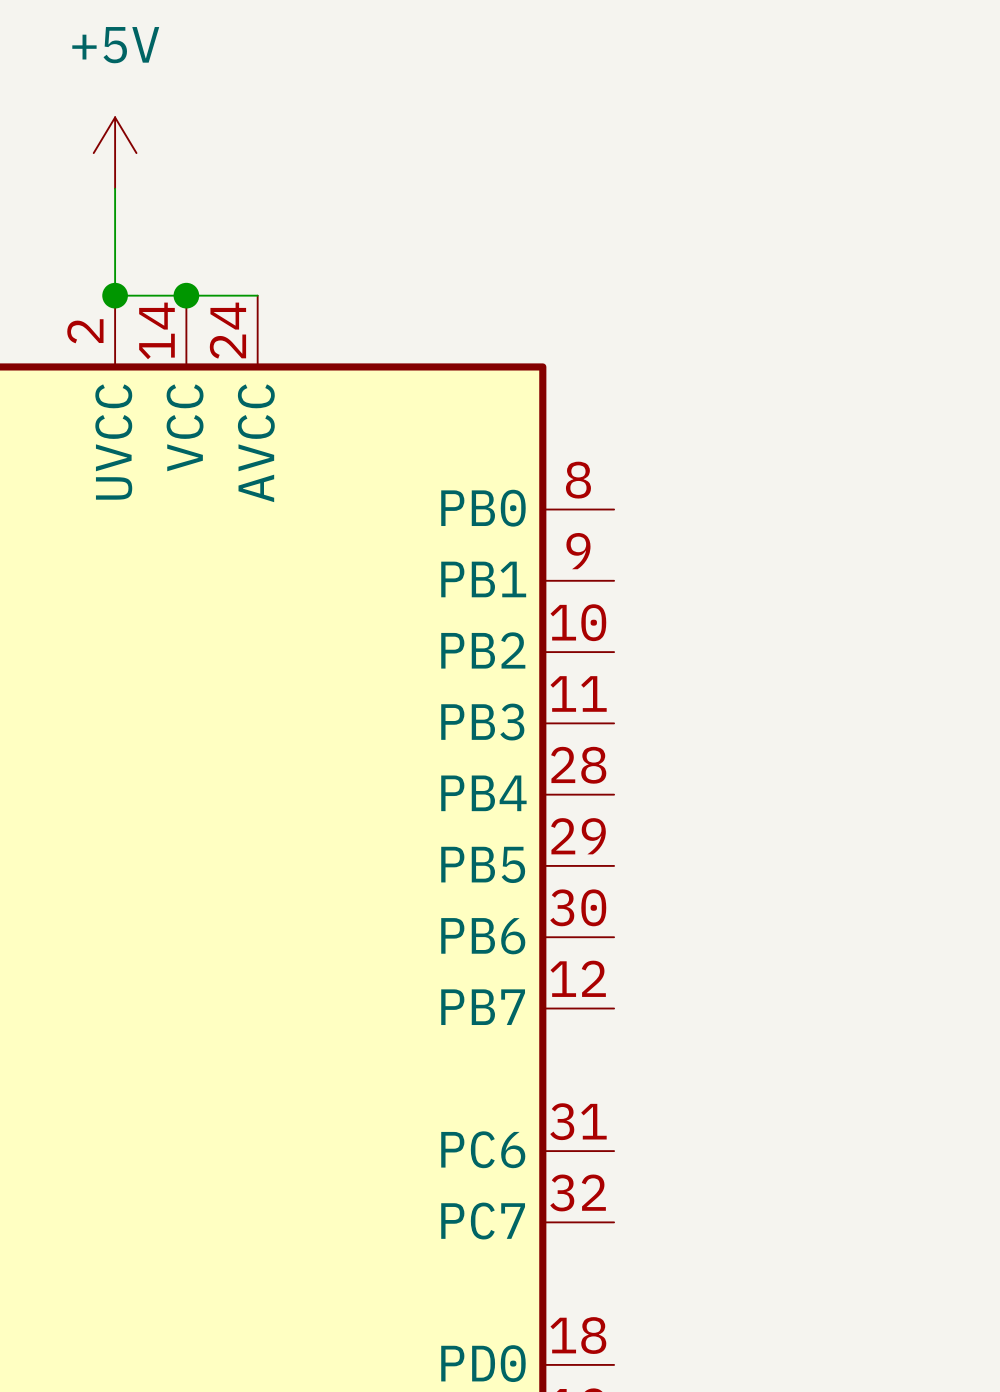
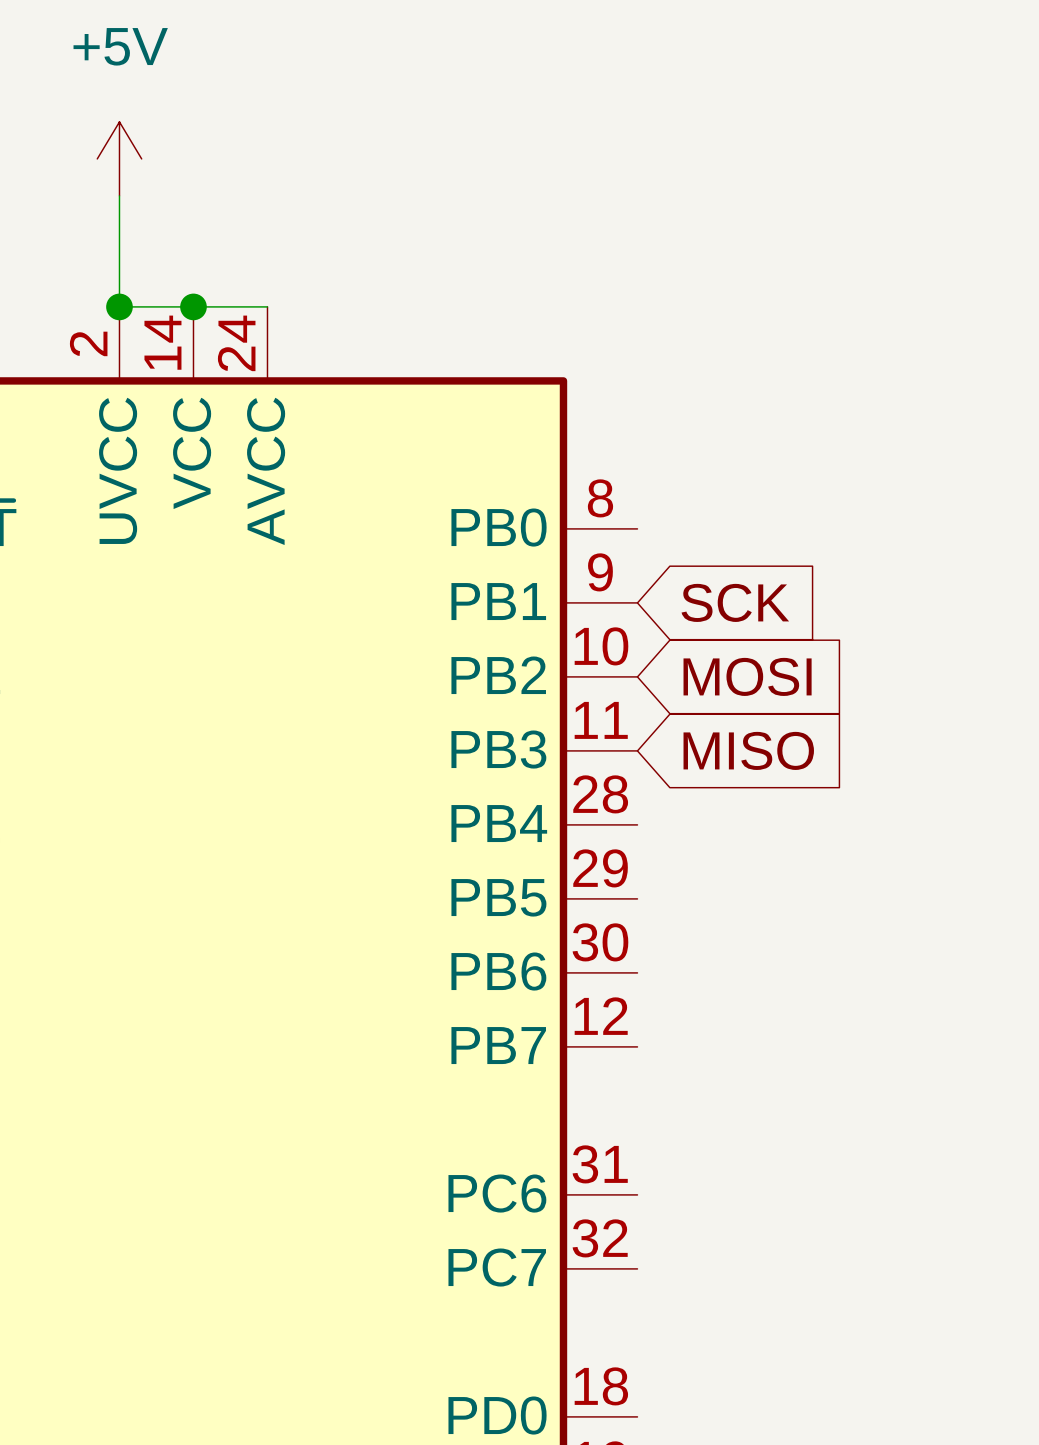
global label: none -> SCK (735, 602)
global label: none -> MOSI (747, 676)
global label: none -> MISO (748, 750)

